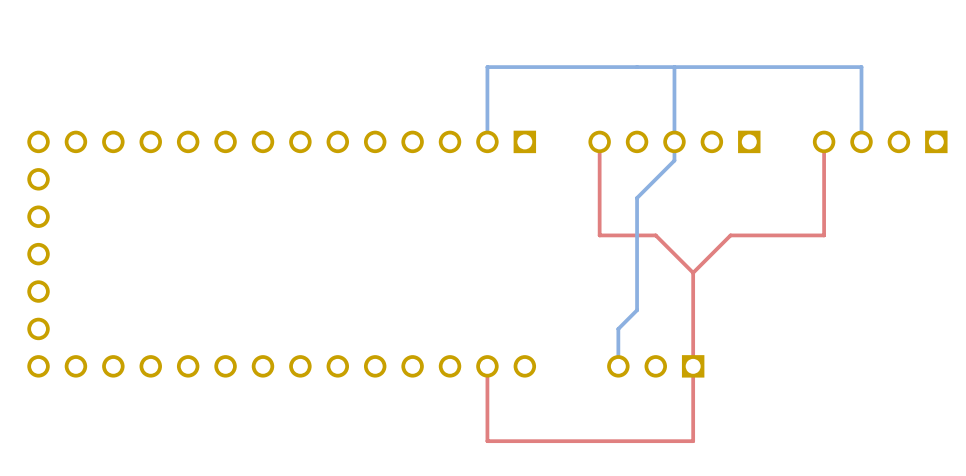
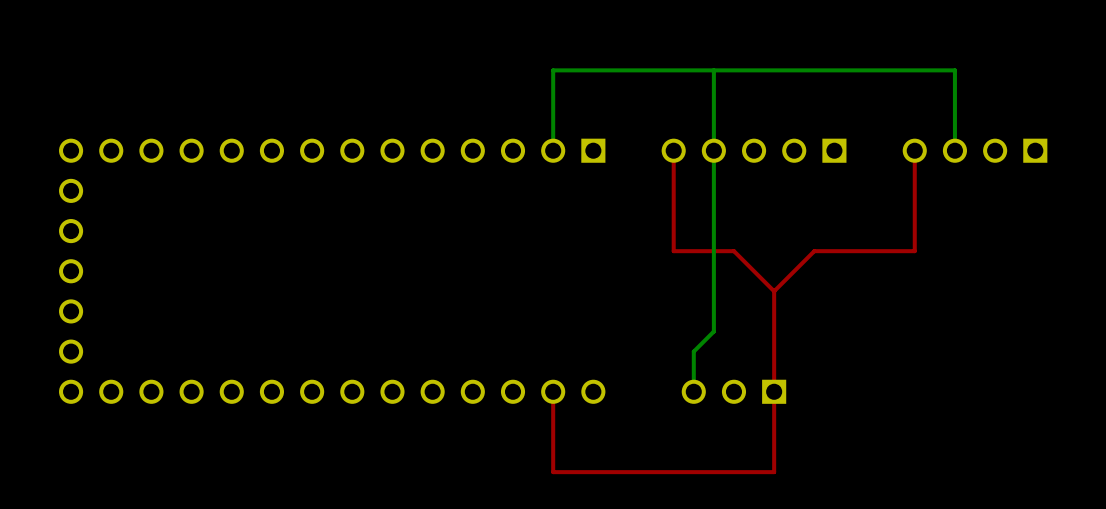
bottom track: (674, 67) (674, 160) (637, 198) -> (713, 70) (713, 210)

